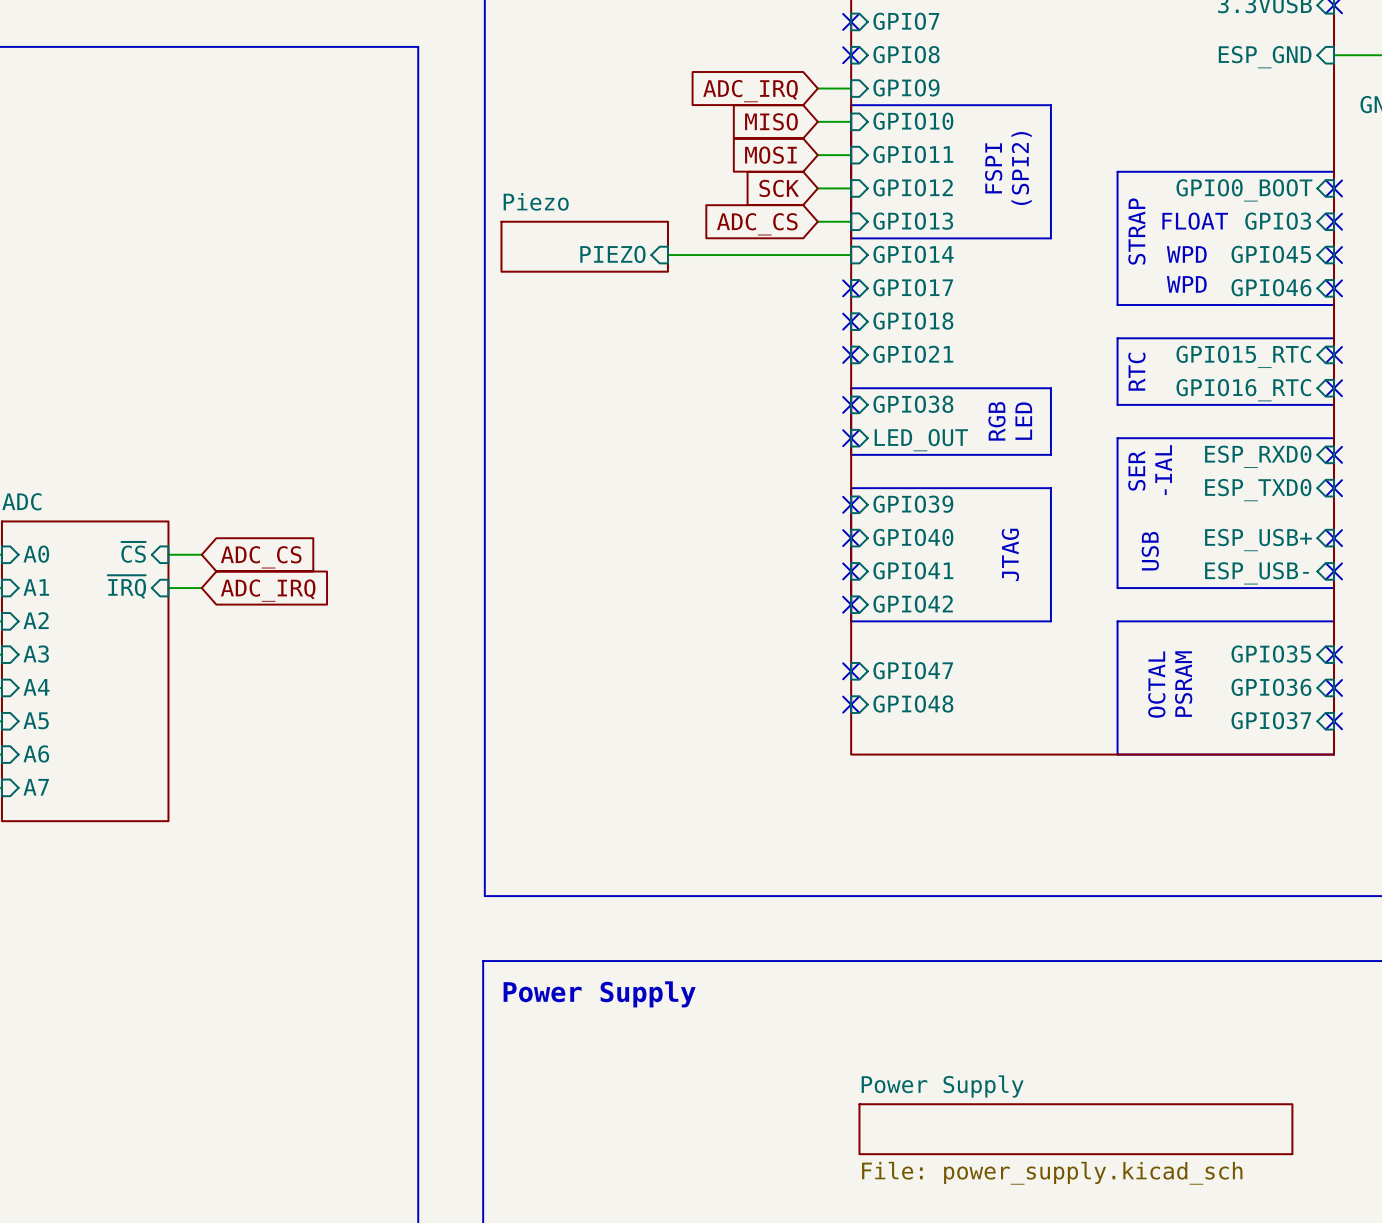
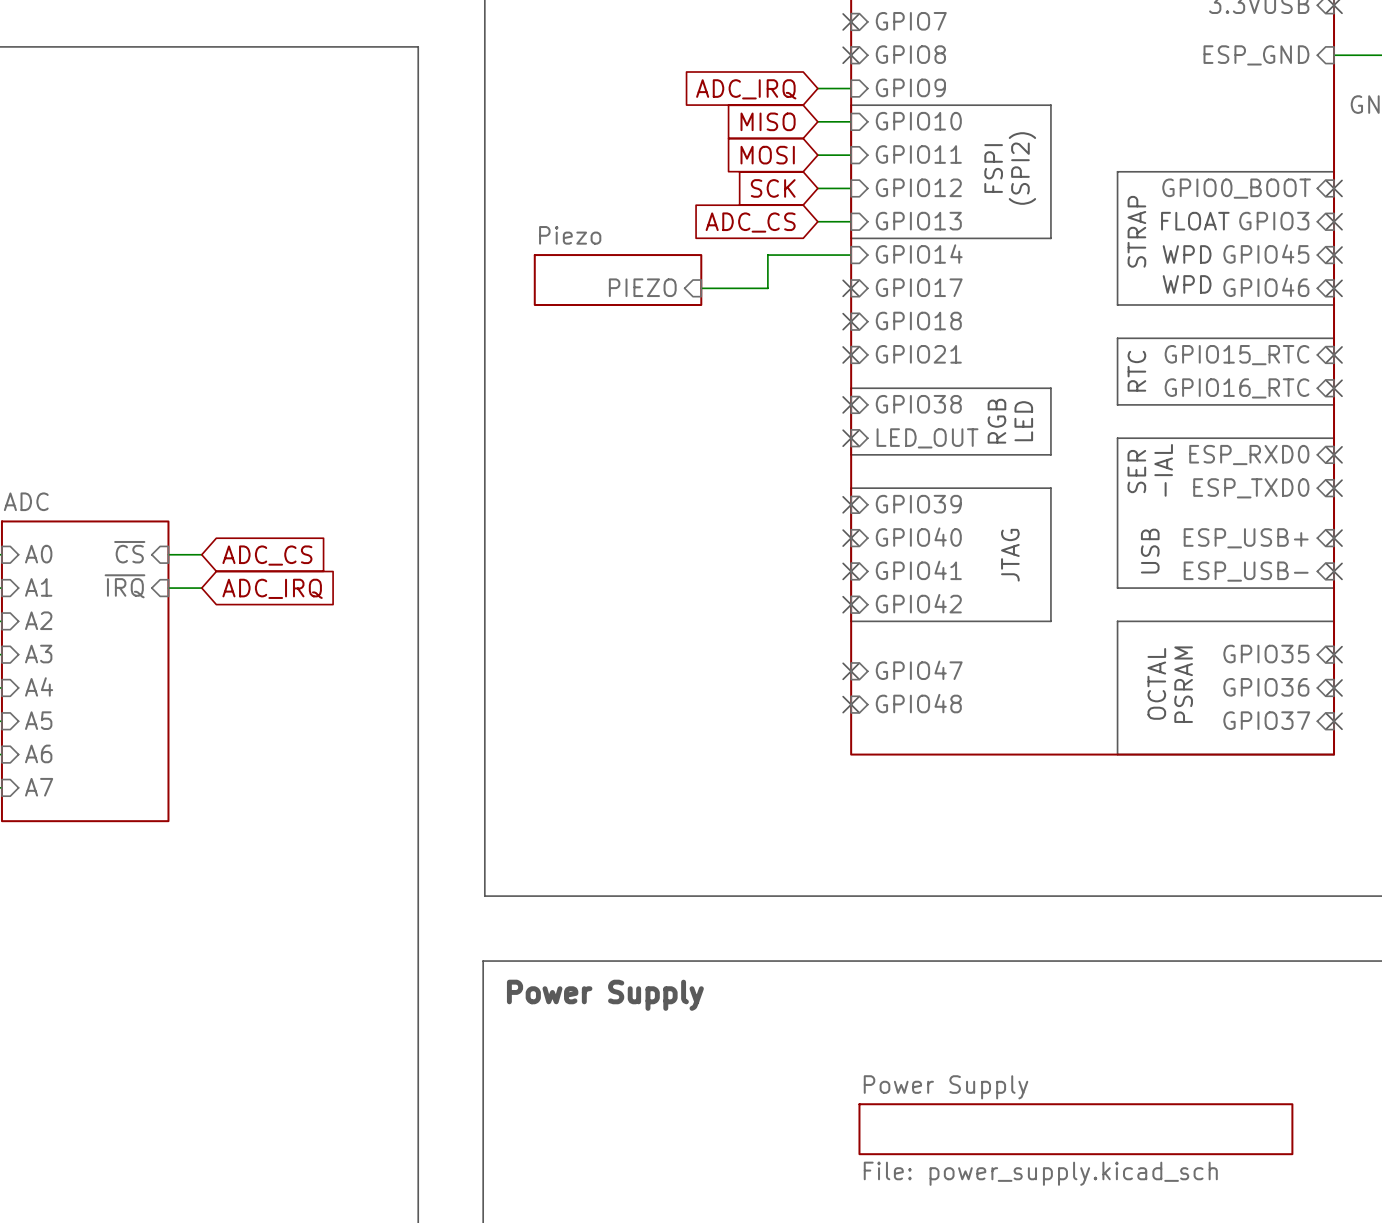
sheet Piezo position: (584, 246) -> (618, 280)
sheet pin position: PIEZO (612, 254) -> PIEZO (642, 287)
wire: (667, 255) (767, 255) -> (701, 288) (767, 288) (767, 255)

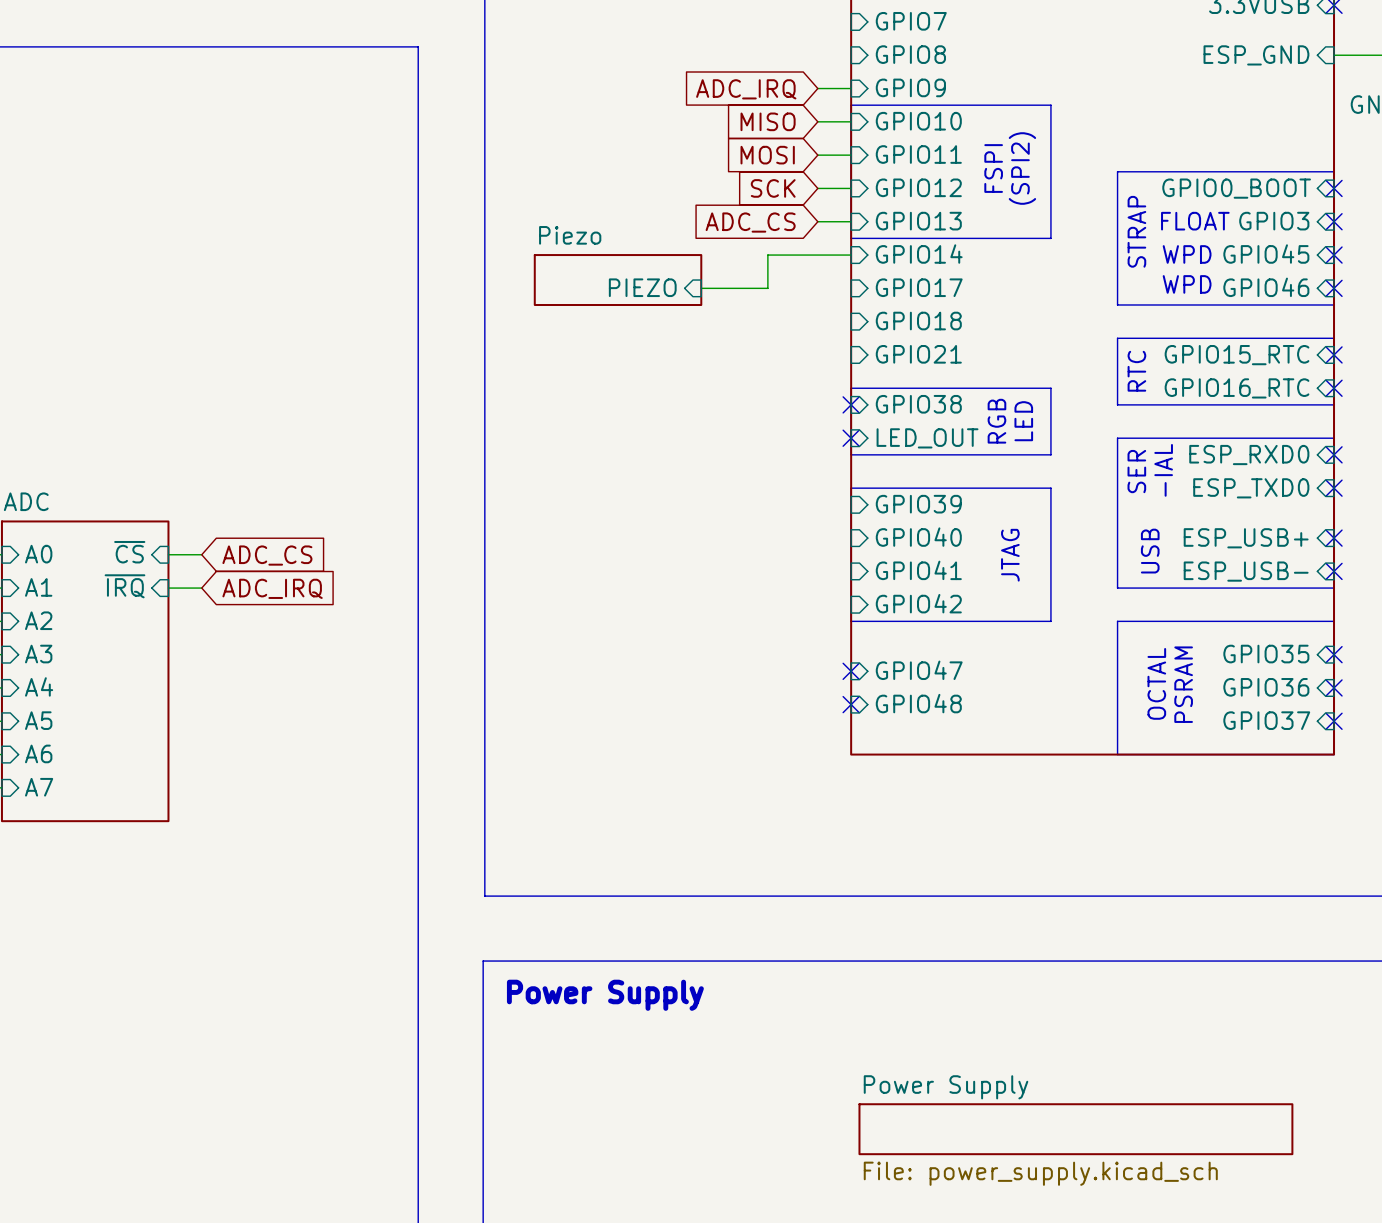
no-connect mark: (851, 21) -> none
no-connect mark: (851, 55) -> none
no-connect mark: (851, 288) -> none
no-connect mark: (851, 321) -> none
no-connect mark: (851, 354) -> none
no-connect mark: (851, 504) -> none
no-connect mark: (851, 538) -> none
no-connect mark: (851, 571) -> none
no-connect mark: (851, 604) -> none

